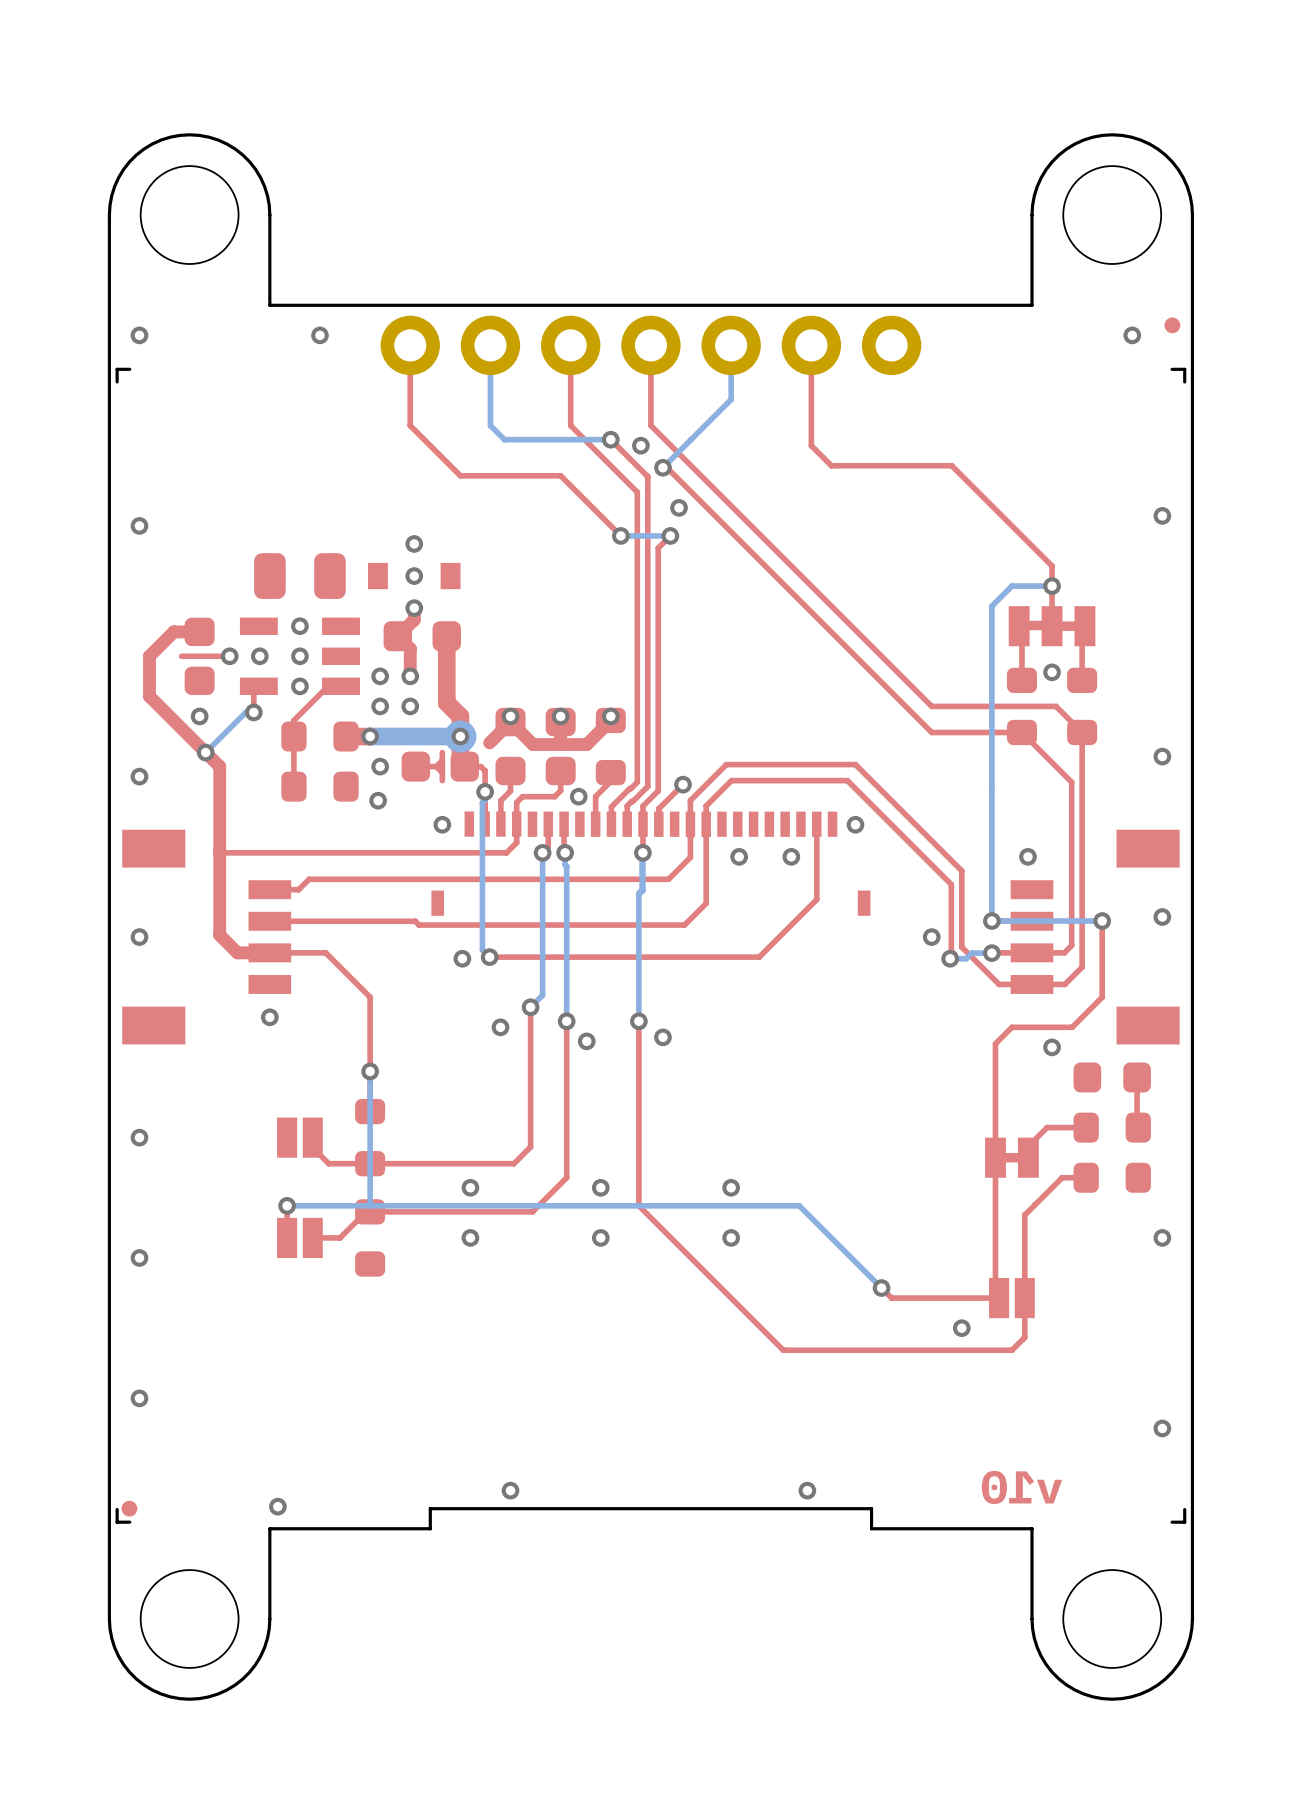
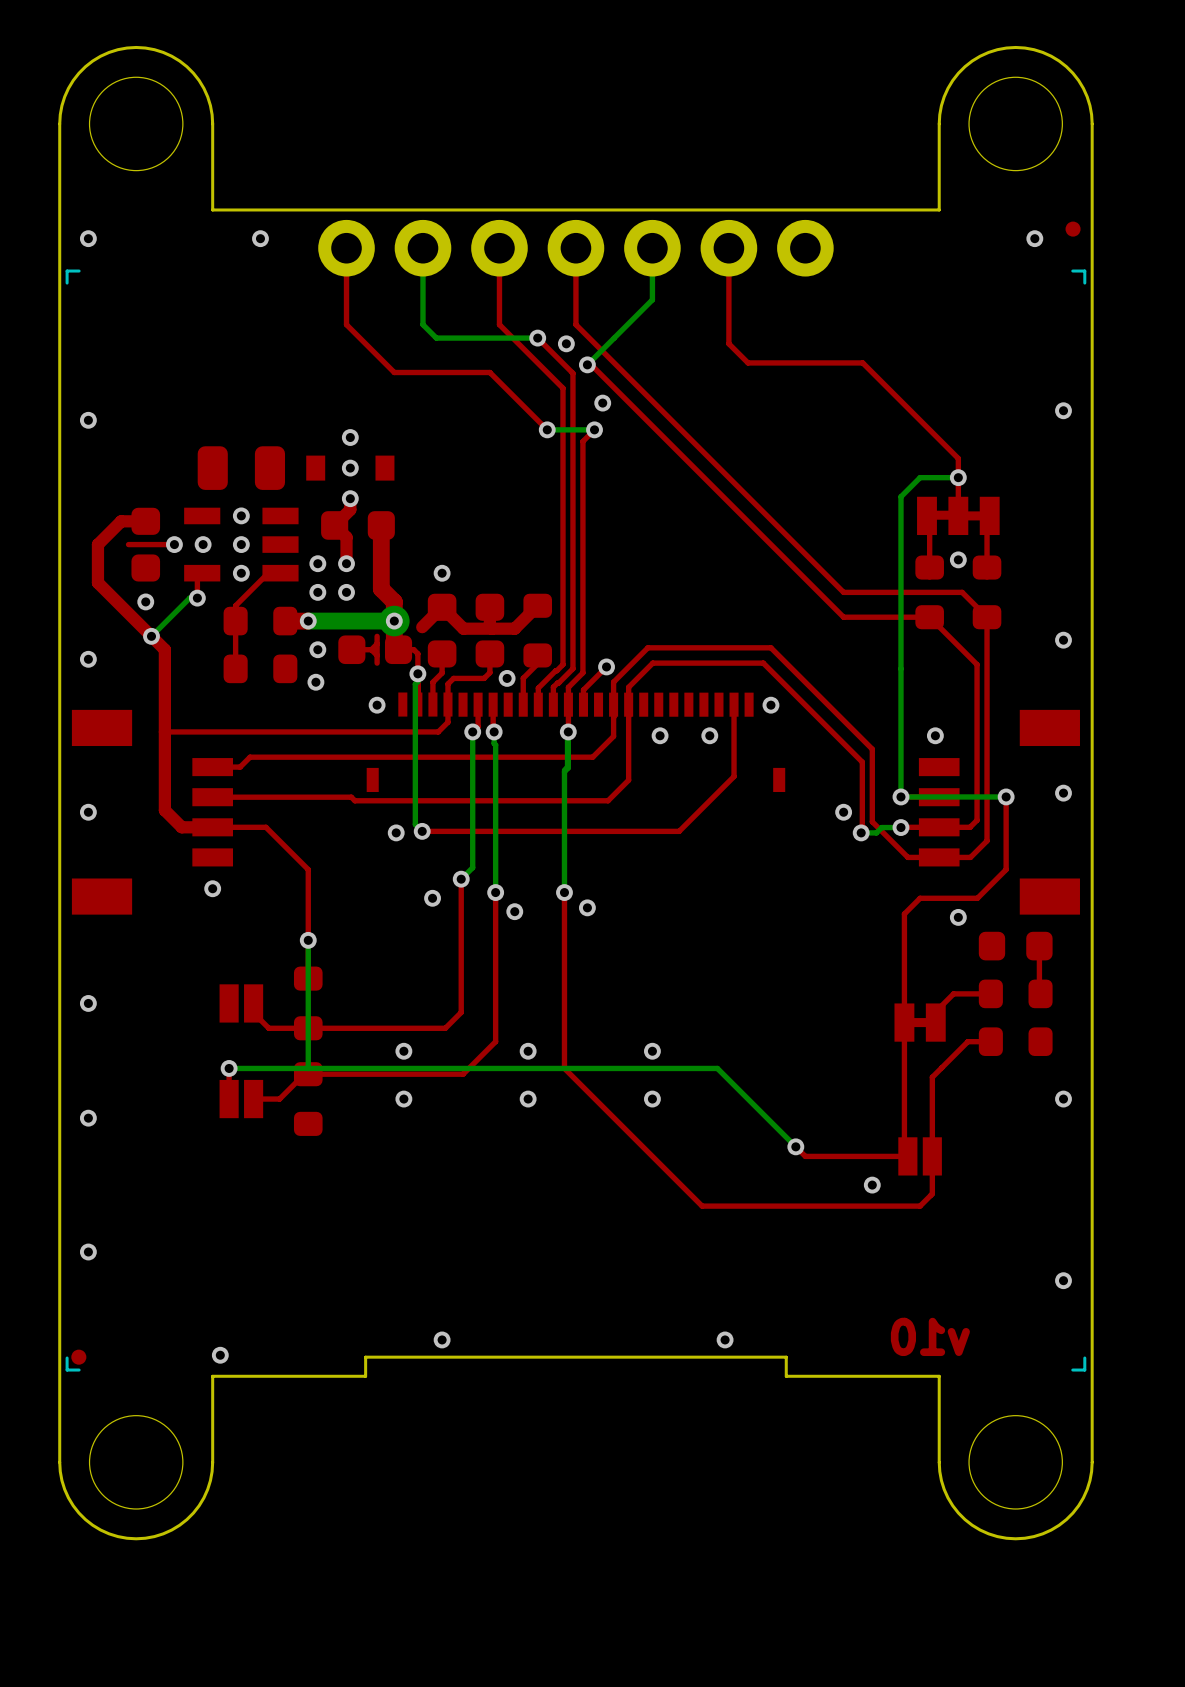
via: none -> (442, 573)
via: (510, 716) -> none
via: (560, 716) -> none
via: (610, 716) -> none

